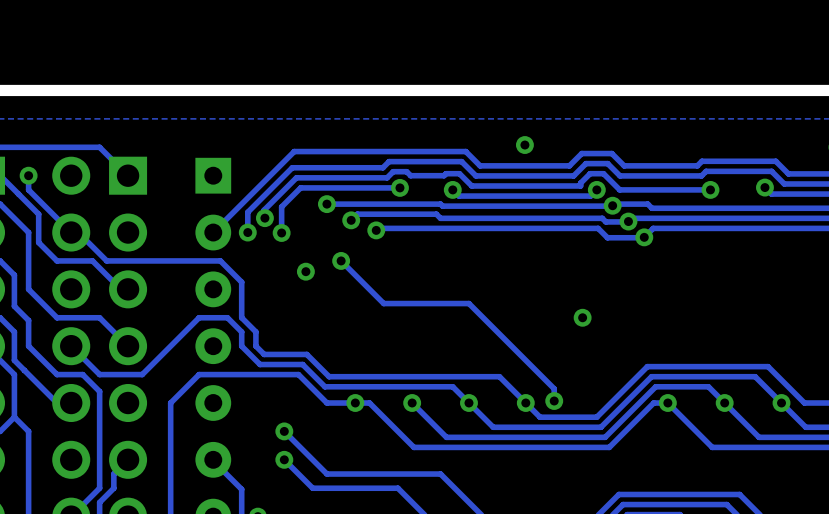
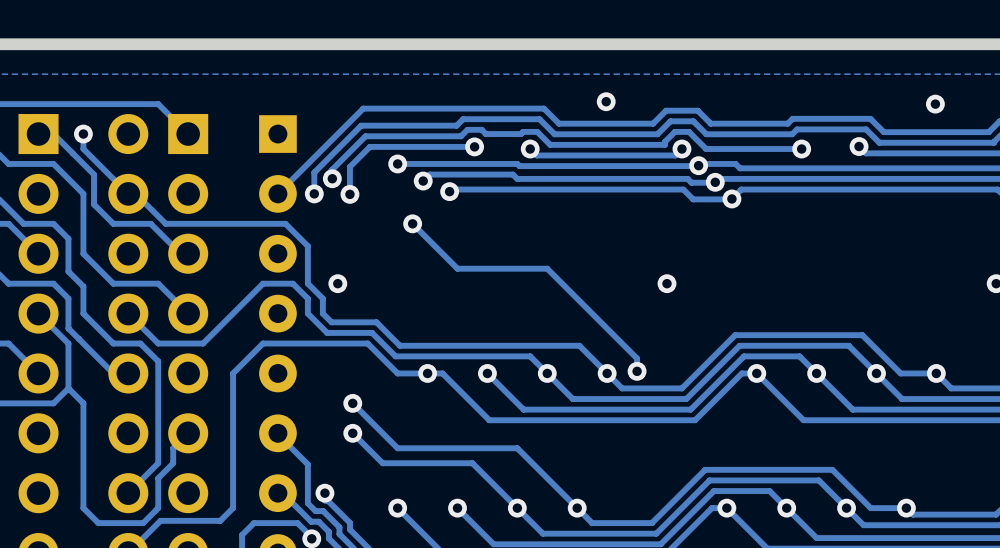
via position: (305, 271) -> (337, 283)

